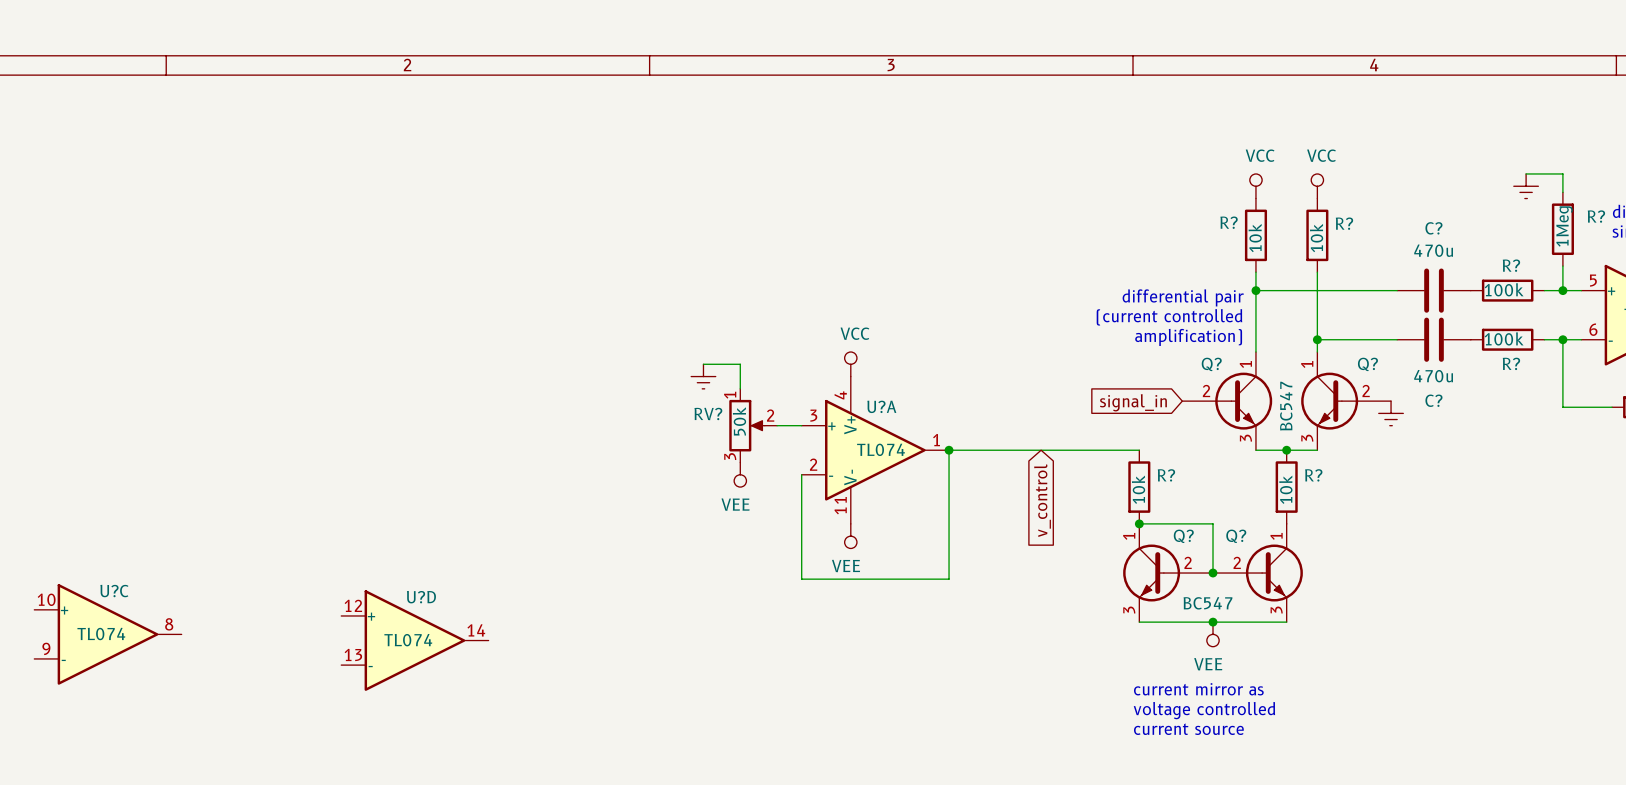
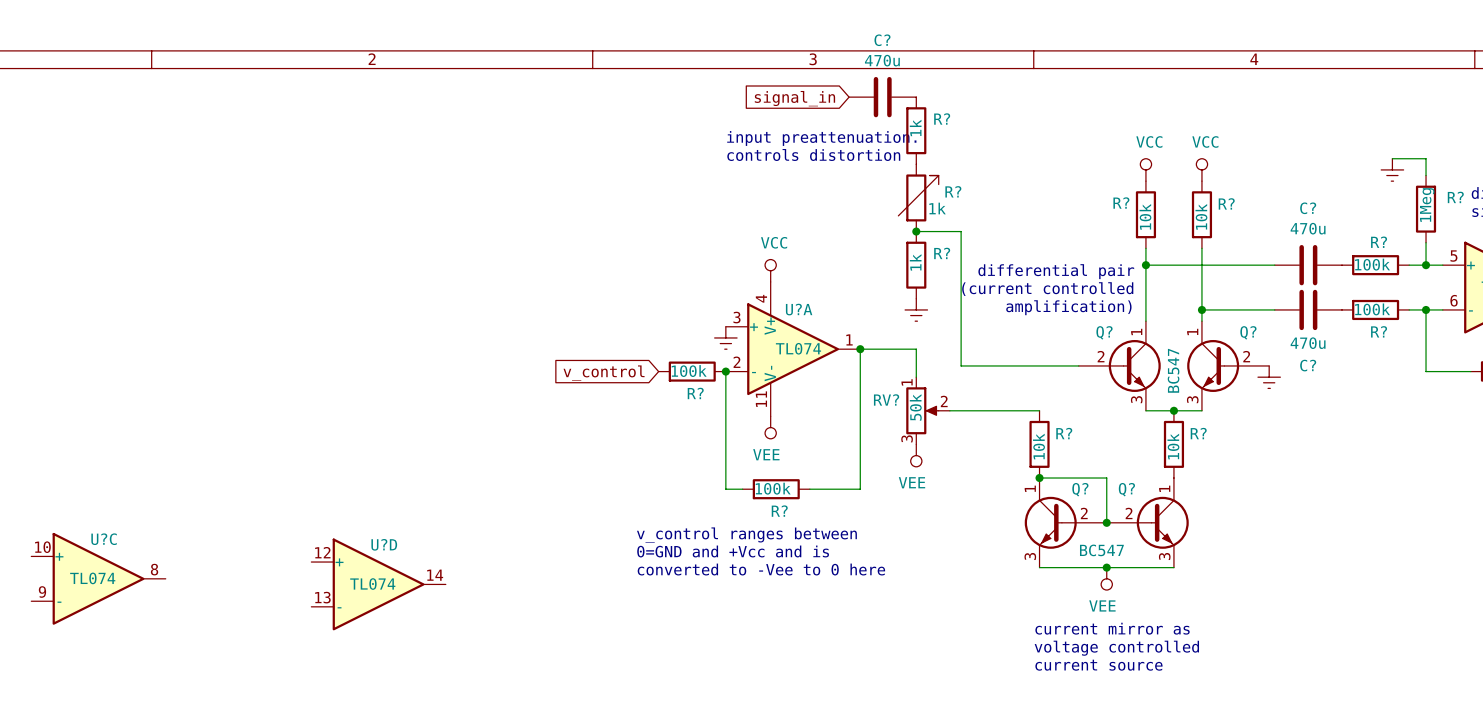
C?: none -> 470u (882, 97)
global label: none -> signal_in (794, 98)
R?: none -> 1k (916, 130)
text: none -> input preattenuation. (821, 138)
text: none -> controls distortion (813, 154)
R?: none -> 1k (918, 197)
wire: none -> (916, 231) (961, 231) (961, 365) (1078, 365)
junction: none -> (916, 231)
R?: none -> 1k (916, 265)
power symbol: none -> (916, 309)
wire: (703, 364) (740, 364) (740, 388) -> none
power symbol position: VCC (850, 364) -> VCC (770, 270)
power symbol position: (703, 376) -> (725, 337)
junction: none -> (860, 349)
global label: signal_in (1133, 402) -> none
R?: none -> 100k (692, 371)
wire: none -> (725, 371) (725, 489) (742, 489)
junction: none -> (725, 371)
global label: none -> v_control (604, 373)
wire: none -> (916, 377) (916, 349) (860, 349) (860, 489) (809, 489)
RV?: 50k (753, 425) -> none
wire: (777, 425) (801, 425) -> none
part position: (850, 450) -> (770, 349)
U?A position: (875, 450) -> (793, 349)
junction: (949, 450) -> none
RV?: none -> 50k (928, 410)
wire: (1041, 450) (949, 450) (949, 579) (801, 579) (801, 474) -> none
power symbol: none -> VEE (770, 427)
power symbol: VEE (740, 474) -> none
power symbol: none -> VEE (916, 455)
global label: v_control (1042, 500) -> none
R?: none -> 100k (776, 489)
power symbol: VEE (850, 536) -> none
text: none -> v_control ranges between (746, 535)
text: none -> 0=GND and +Vcc and is (733, 551)
text: none -> converted to -Vee to 0 here (761, 569)

